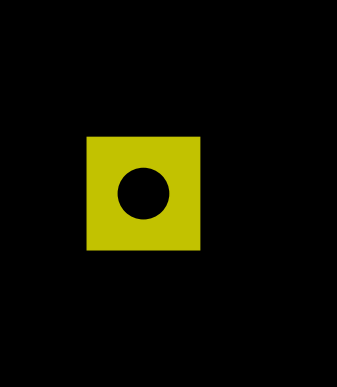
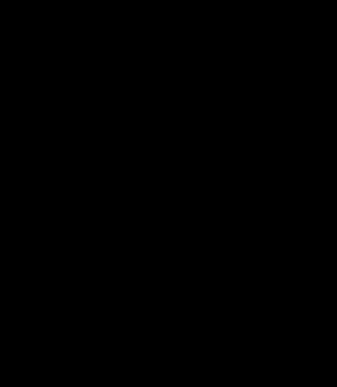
part: (143, 193) -> none

